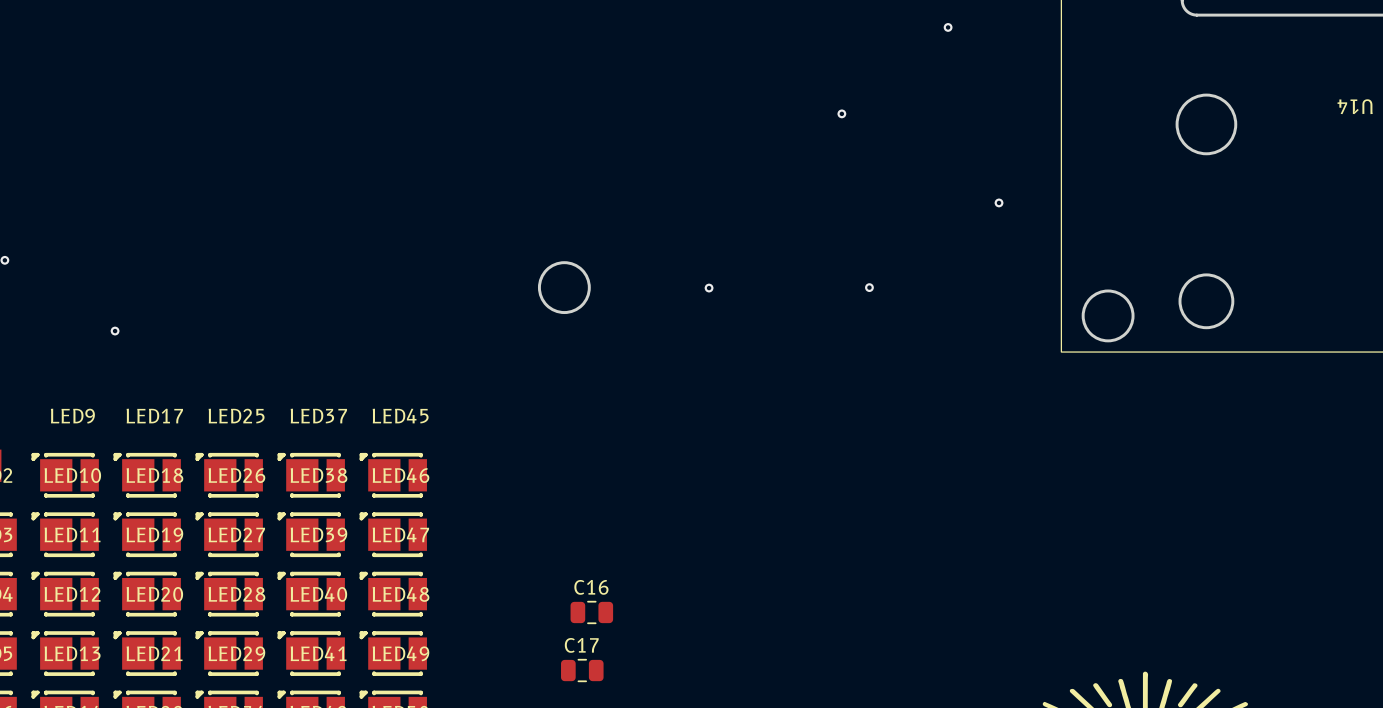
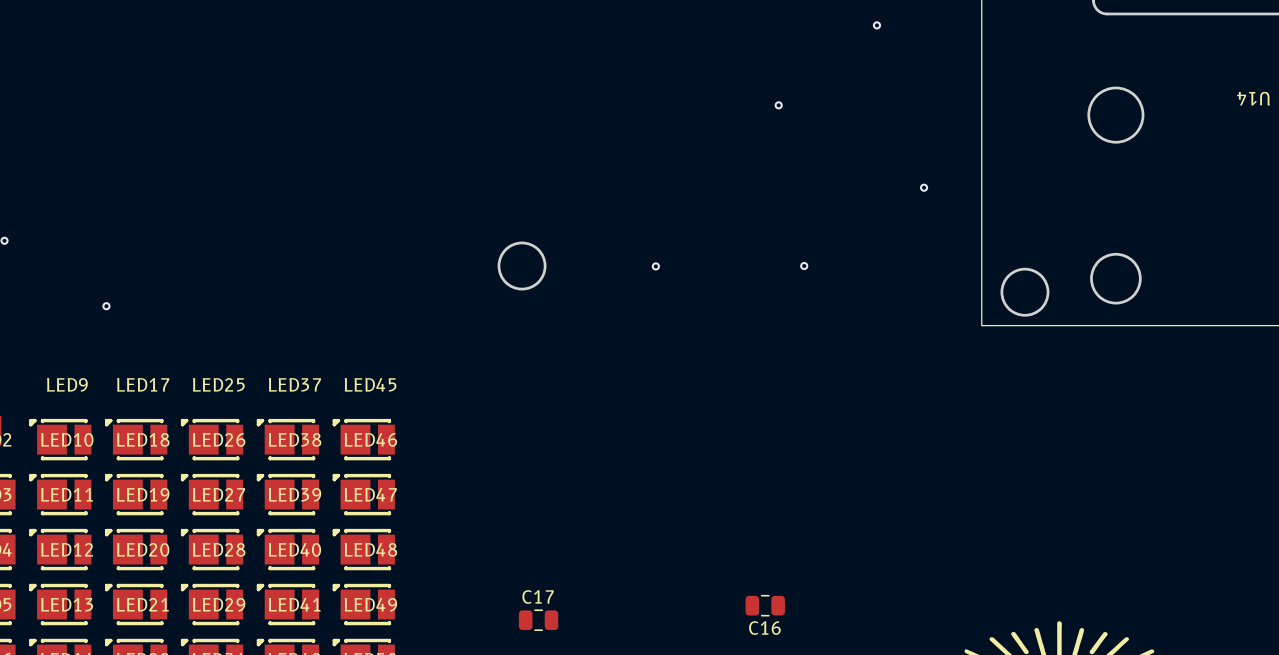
C16 name position: C16 (591, 587) -> C16 (764, 628)
C16 position: (591, 612) -> (765, 605)

